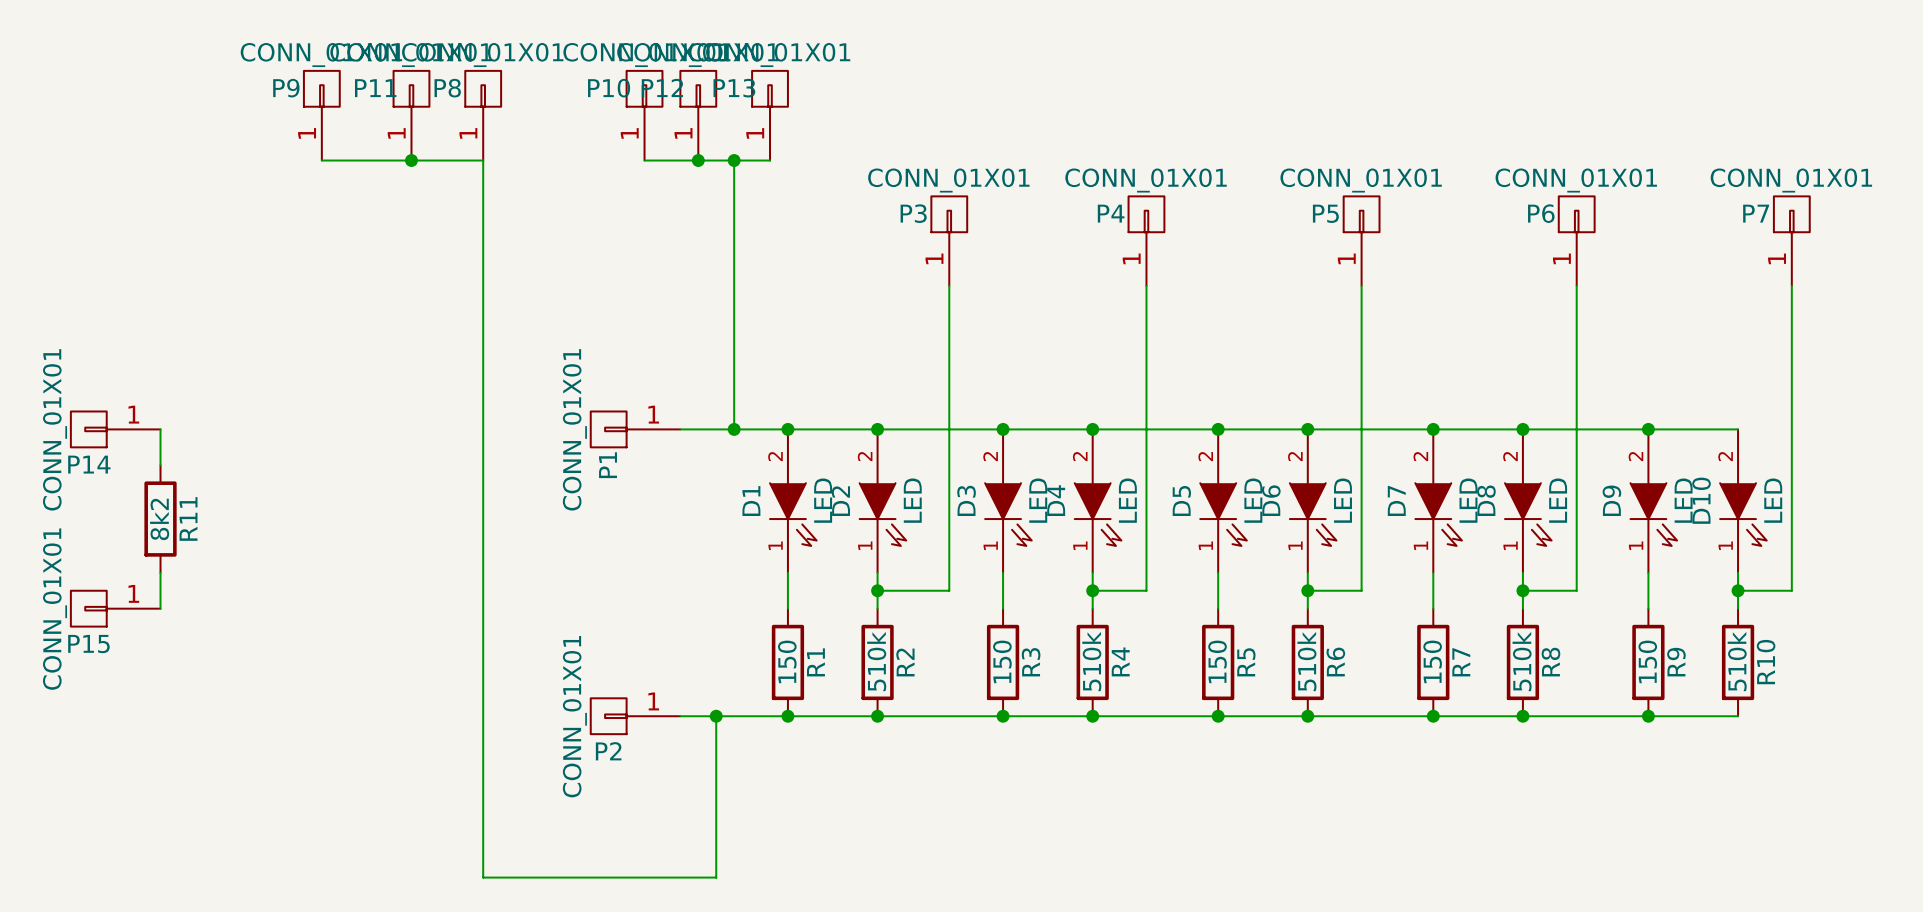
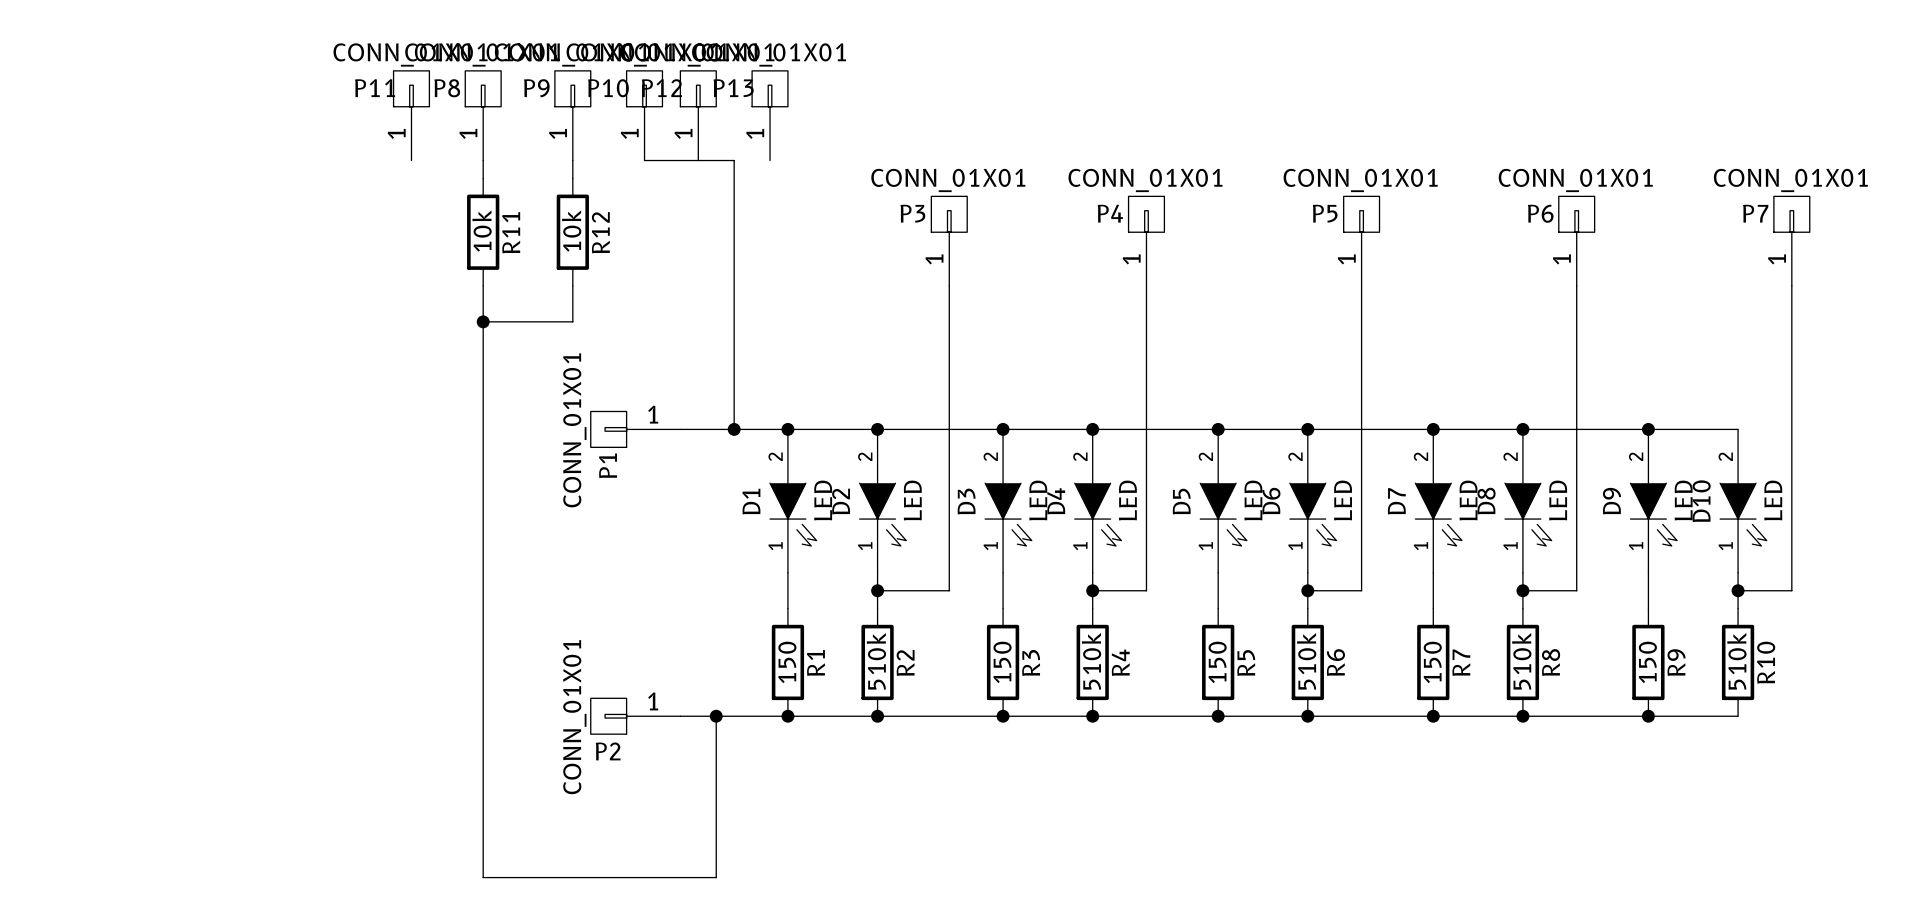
P9 position: (321, 115) -> (572, 115)
wire: (321, 160) (483, 160) -> none
junction: (411, 160) -> none
wire: none -> (572, 160) (572, 178)
junction: (698, 160) -> none
wire: (734, 160) (770, 160) -> none
junction: (734, 160) -> none
wire: (483, 178) (483, 286) -> none
R12: none -> 10k (572, 232)
wire: none -> (572, 286) (572, 321) (483, 321)
junction: none -> (483, 321)
P14: CONN_01X01 (115, 429) -> none
wire: (160, 429) (160, 465) -> none
R11 value: 8k2 (159, 519) -> 10k (482, 231)
R11 position: (160, 519) -> (483, 232)
wire: (160, 572) (160, 608) -> none
P15: CONN_01X01 (115, 608) -> none

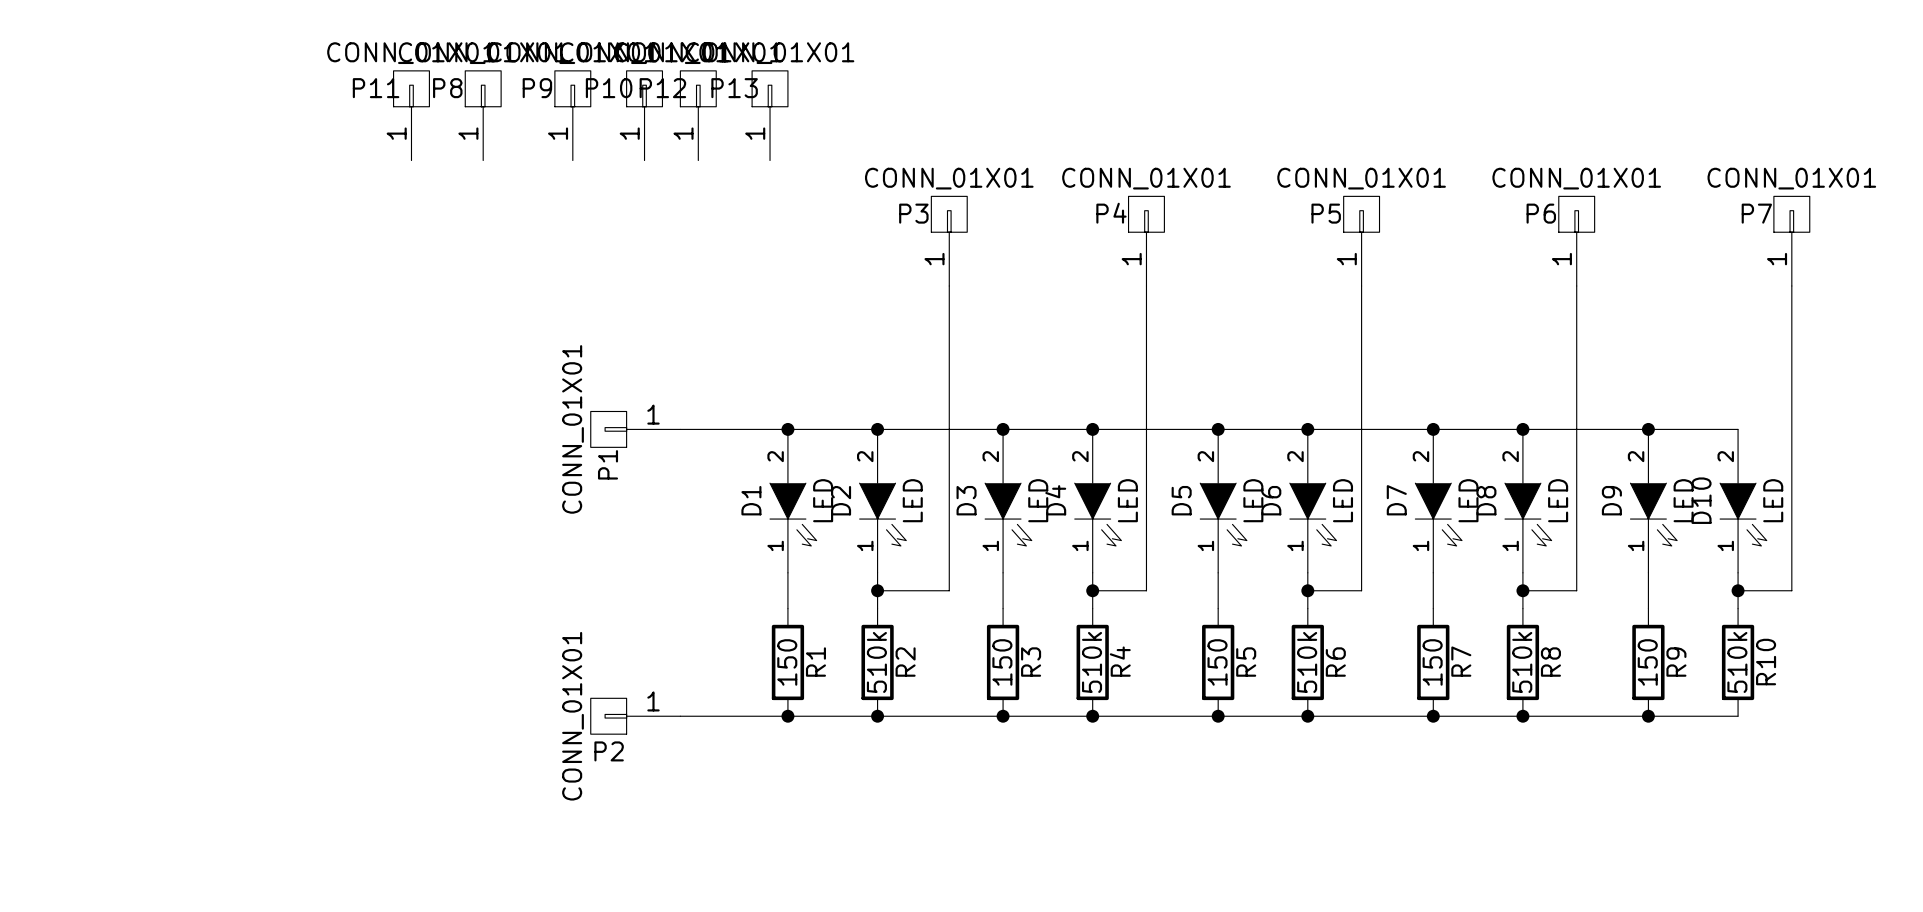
wire: (483, 160) (483, 178) -> none
wire: (572, 160) (572, 178) -> none
wire: (644, 160) (734, 160) (734, 429) -> none
R11: 10k (483, 232) -> none
R12: 10k (572, 232) -> none
wire: (483, 286) (483, 877) (716, 877) (716, 716) -> none
wire: (572, 286) (572, 321) (483, 321) -> none
junction: (483, 321) -> none
junction: (734, 429) -> none
junction: (716, 716) -> none

